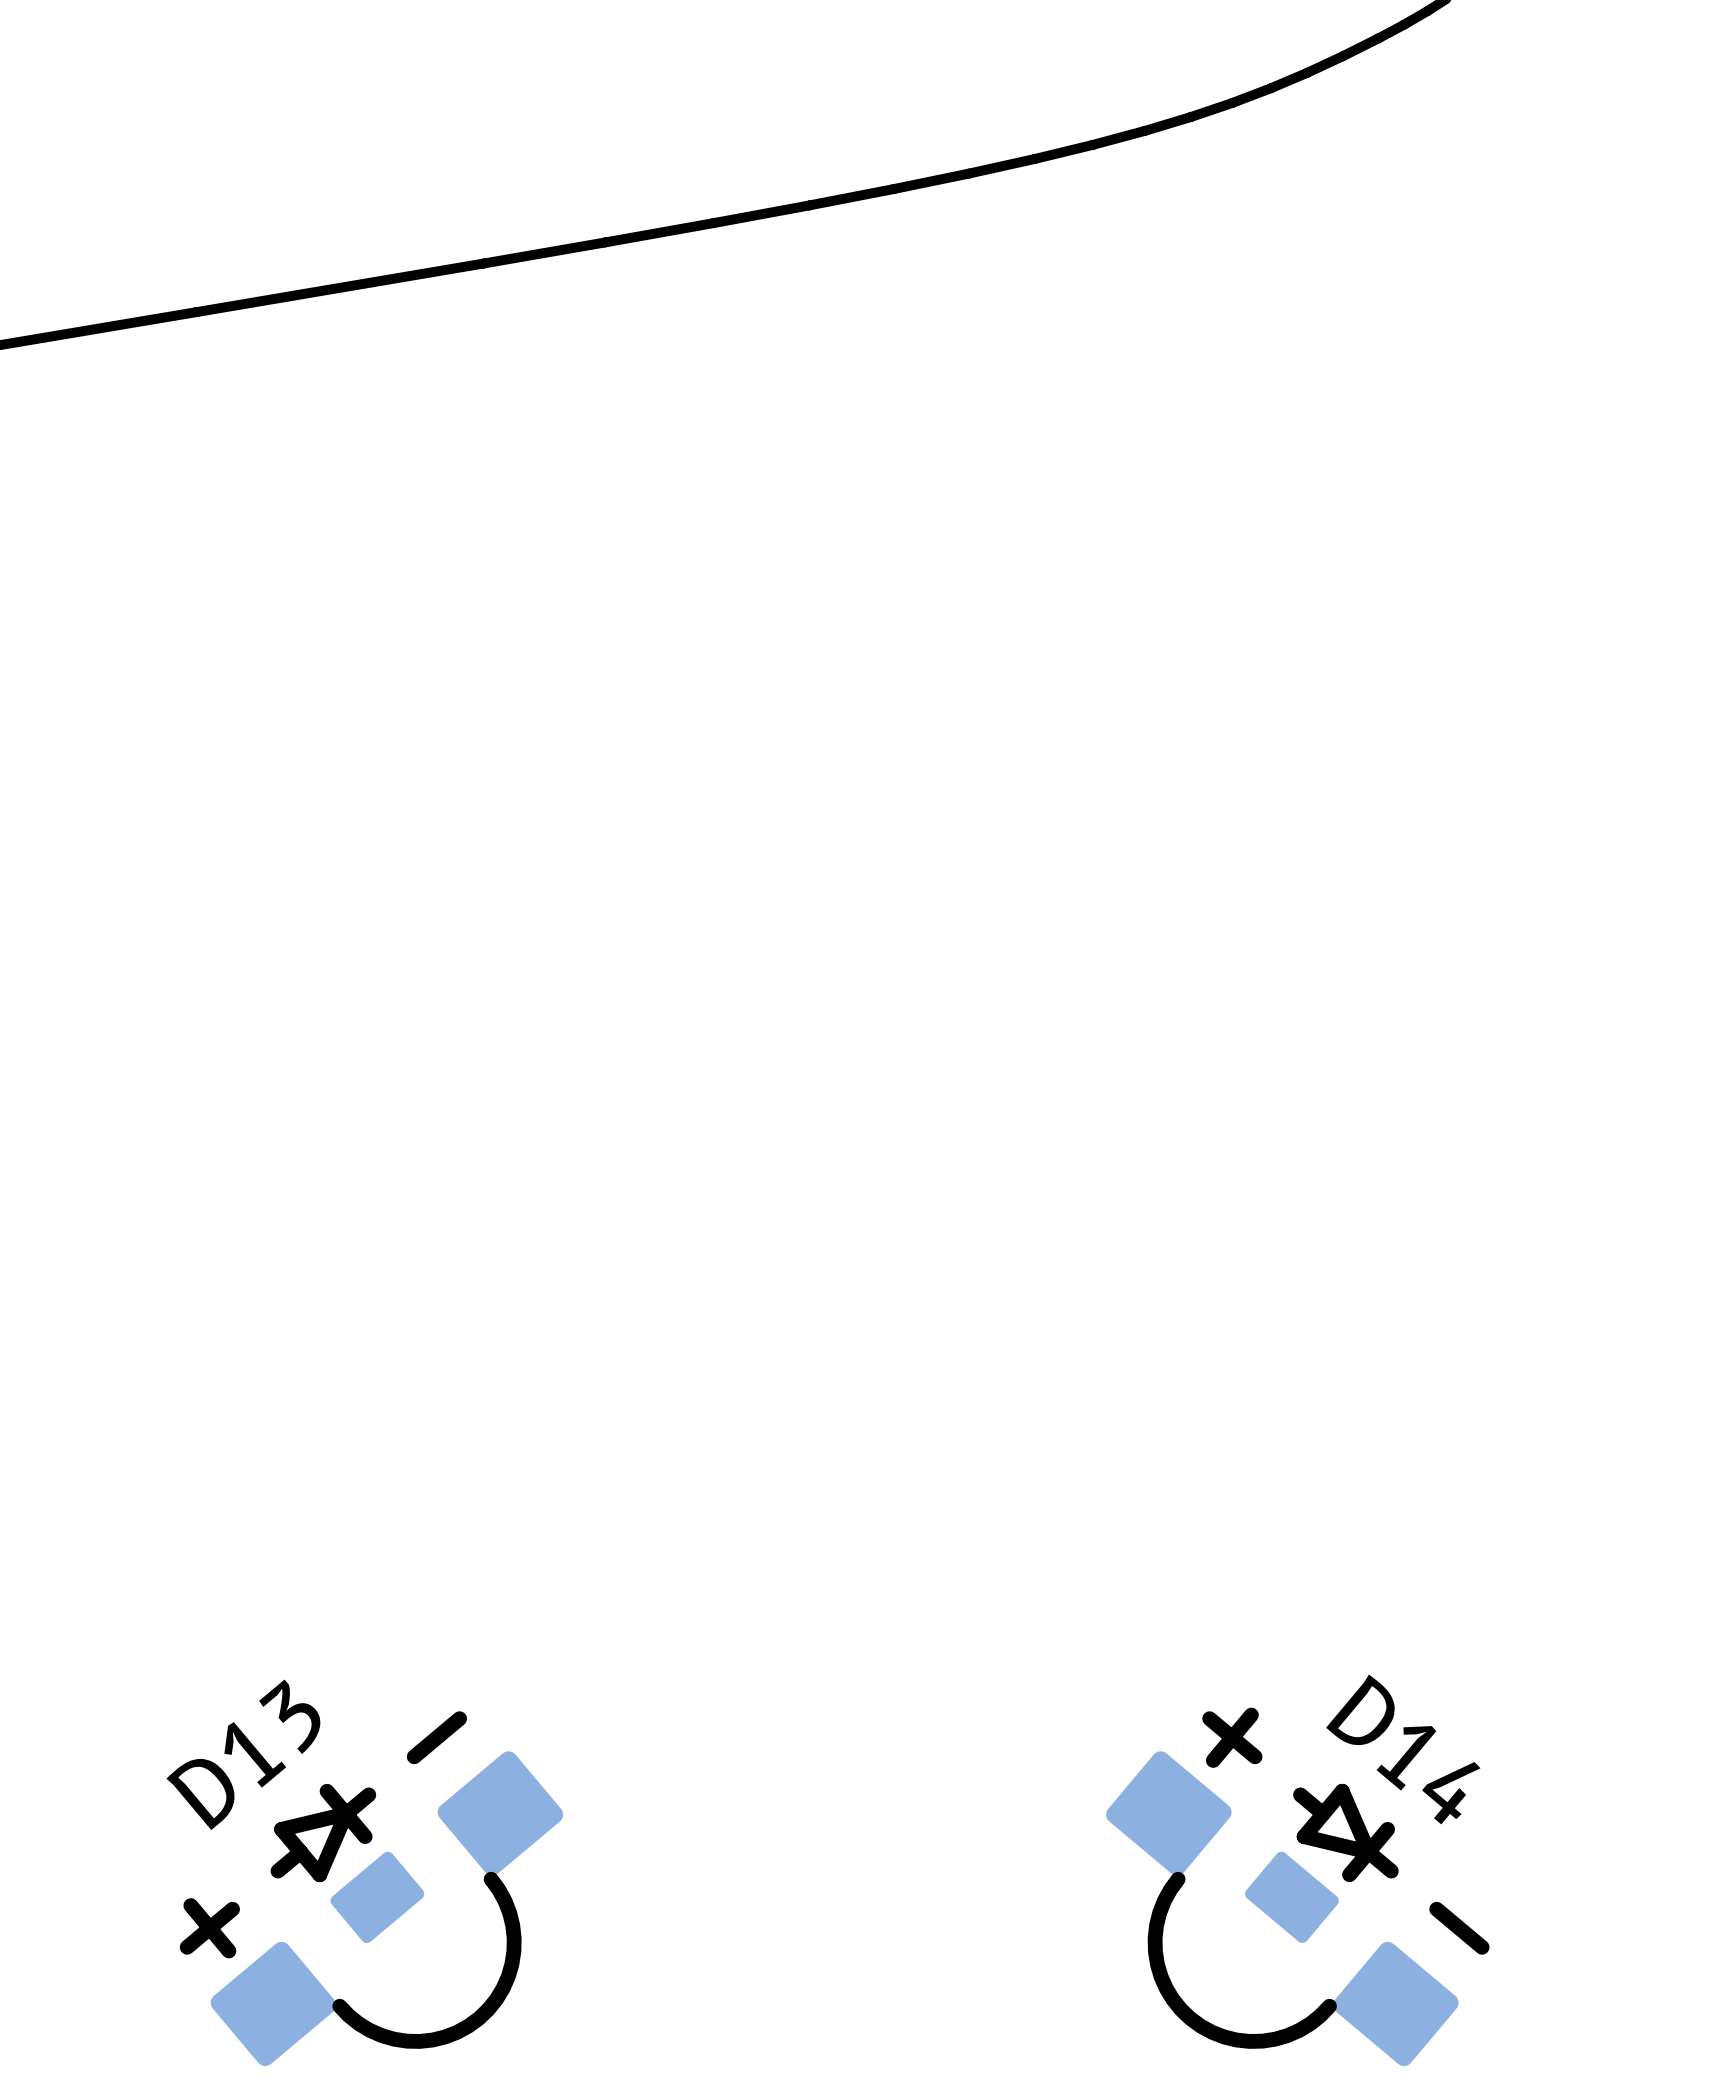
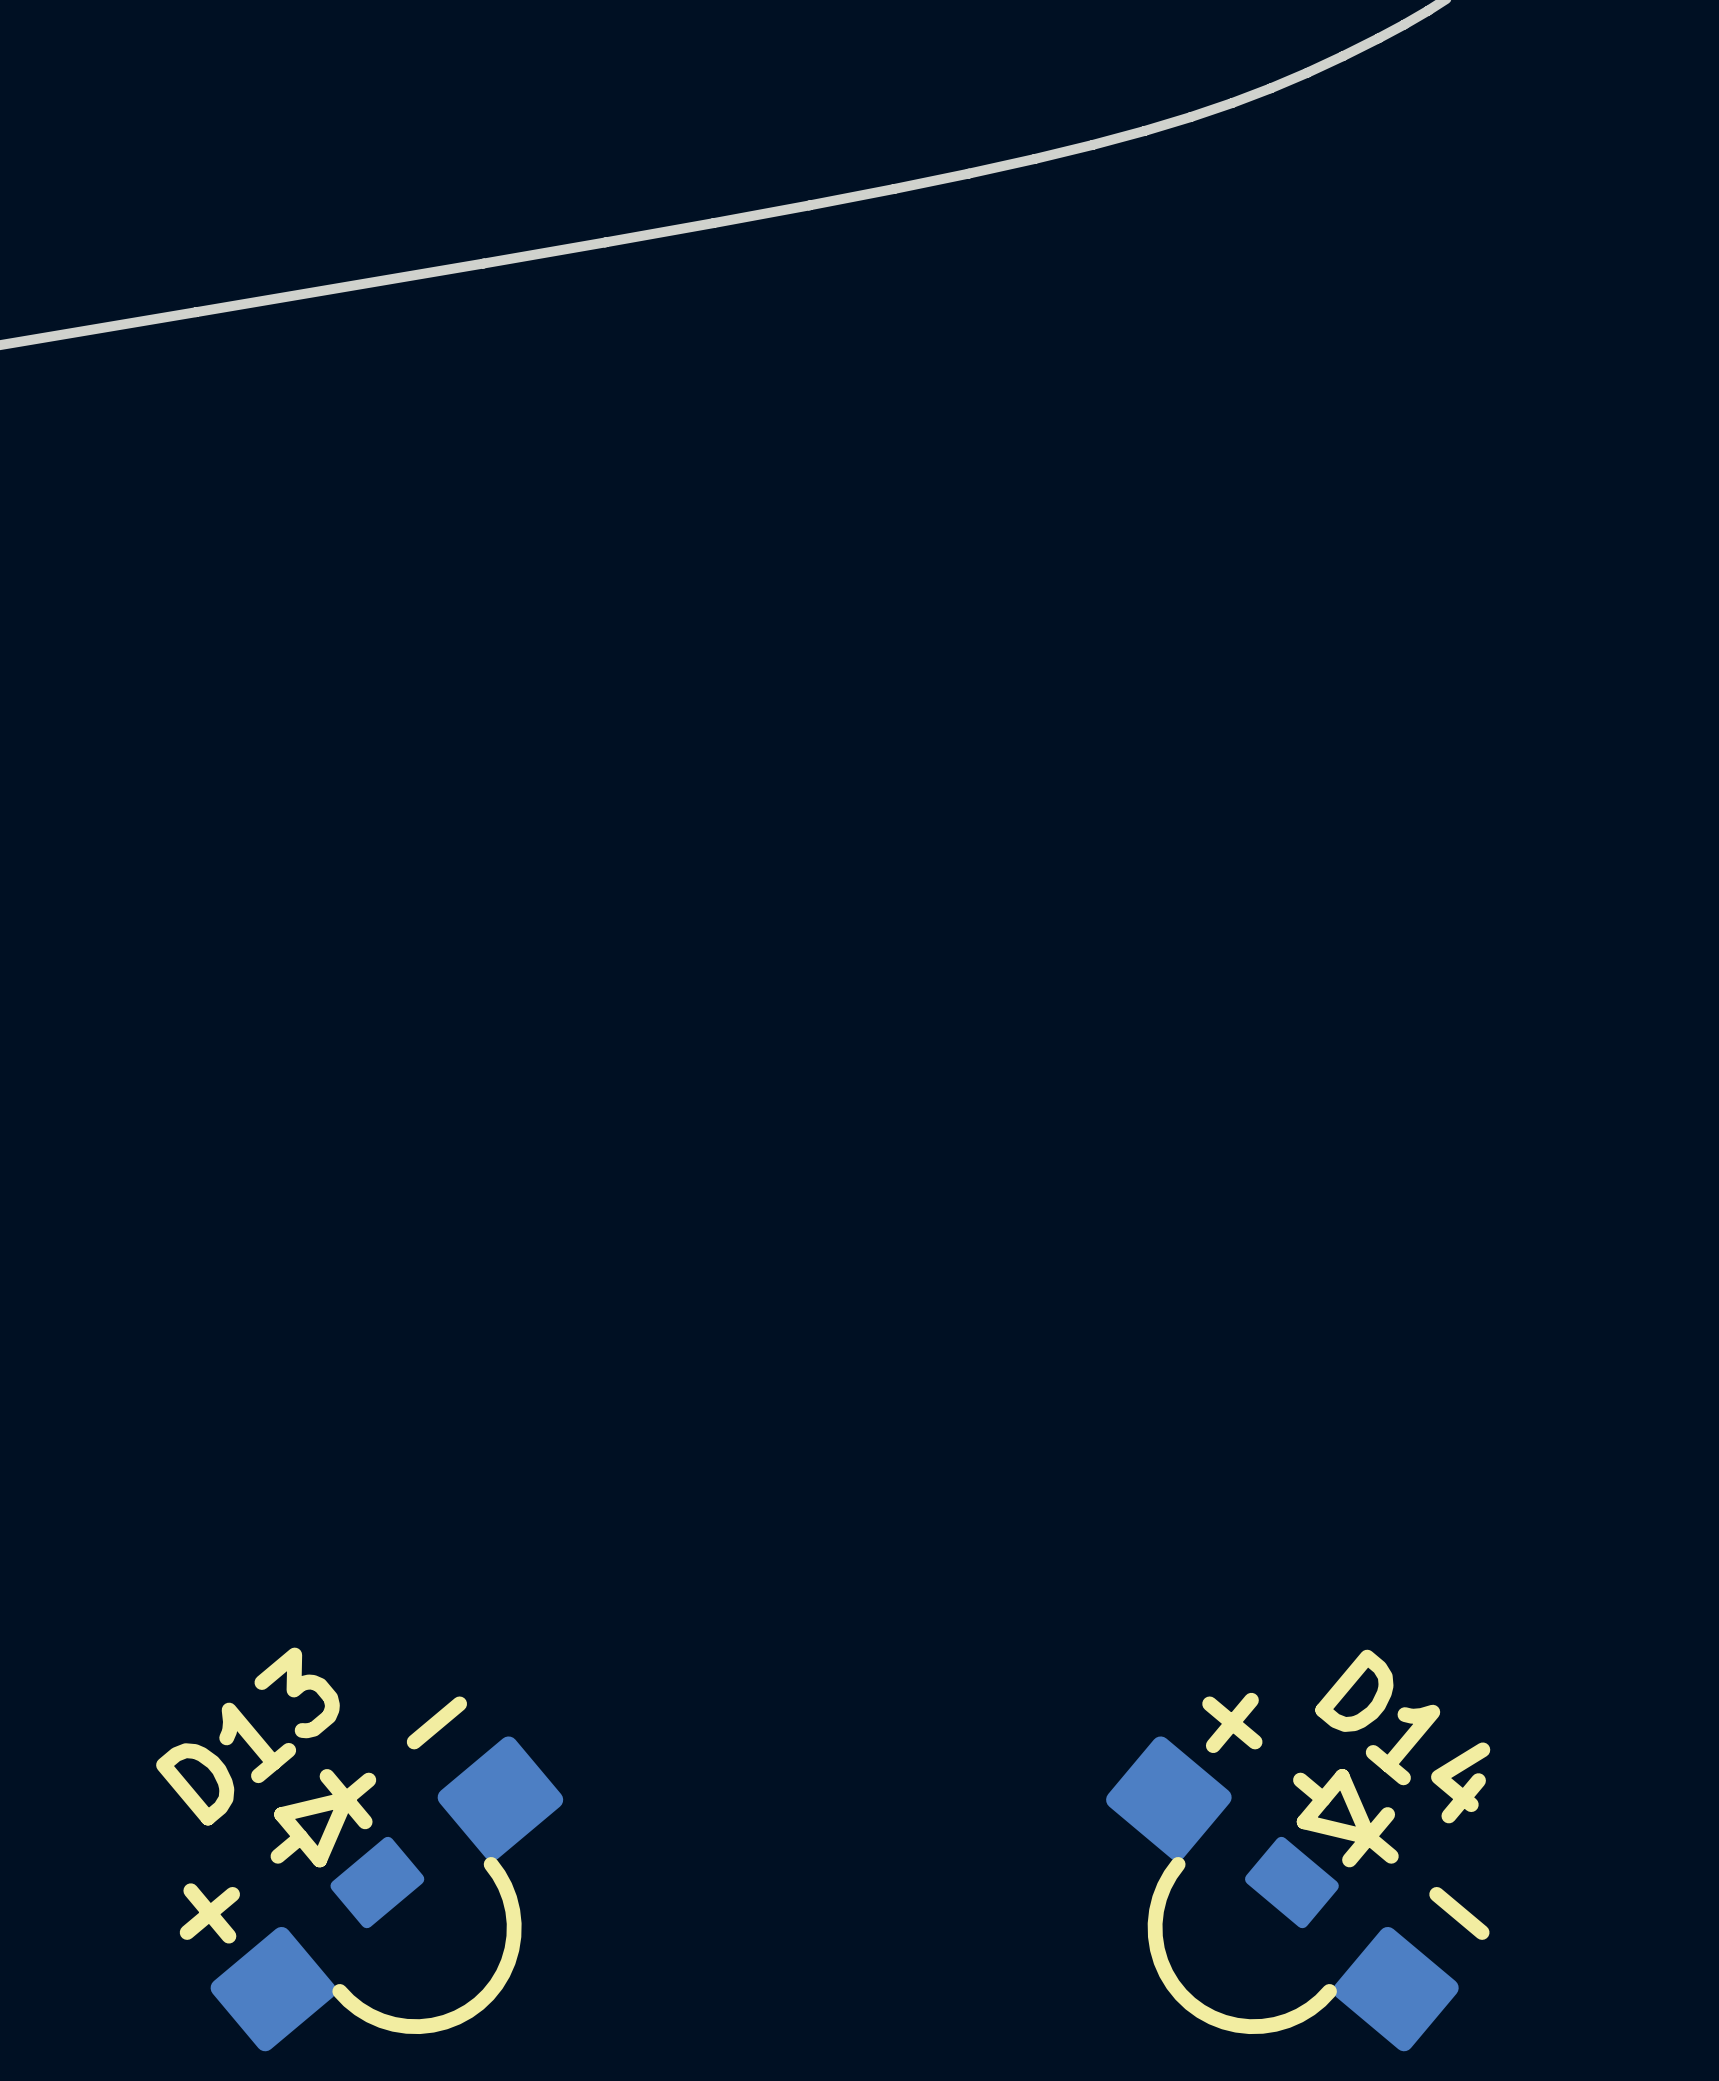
D14 position: (1297, 1886) -> (1297, 1872)
D13 position: (371, 1888) -> (371, 1873)

